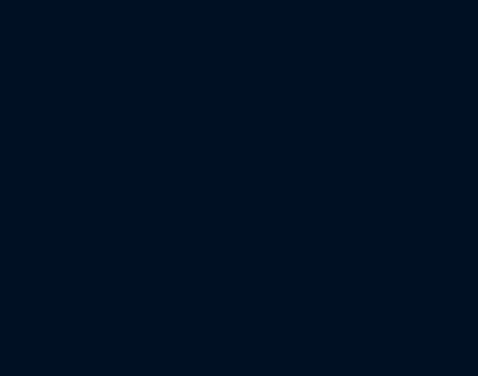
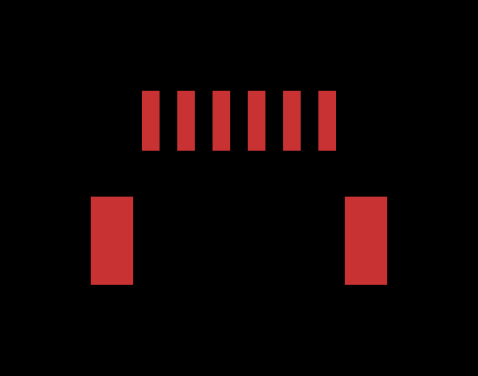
part: none -> (238, 187)

